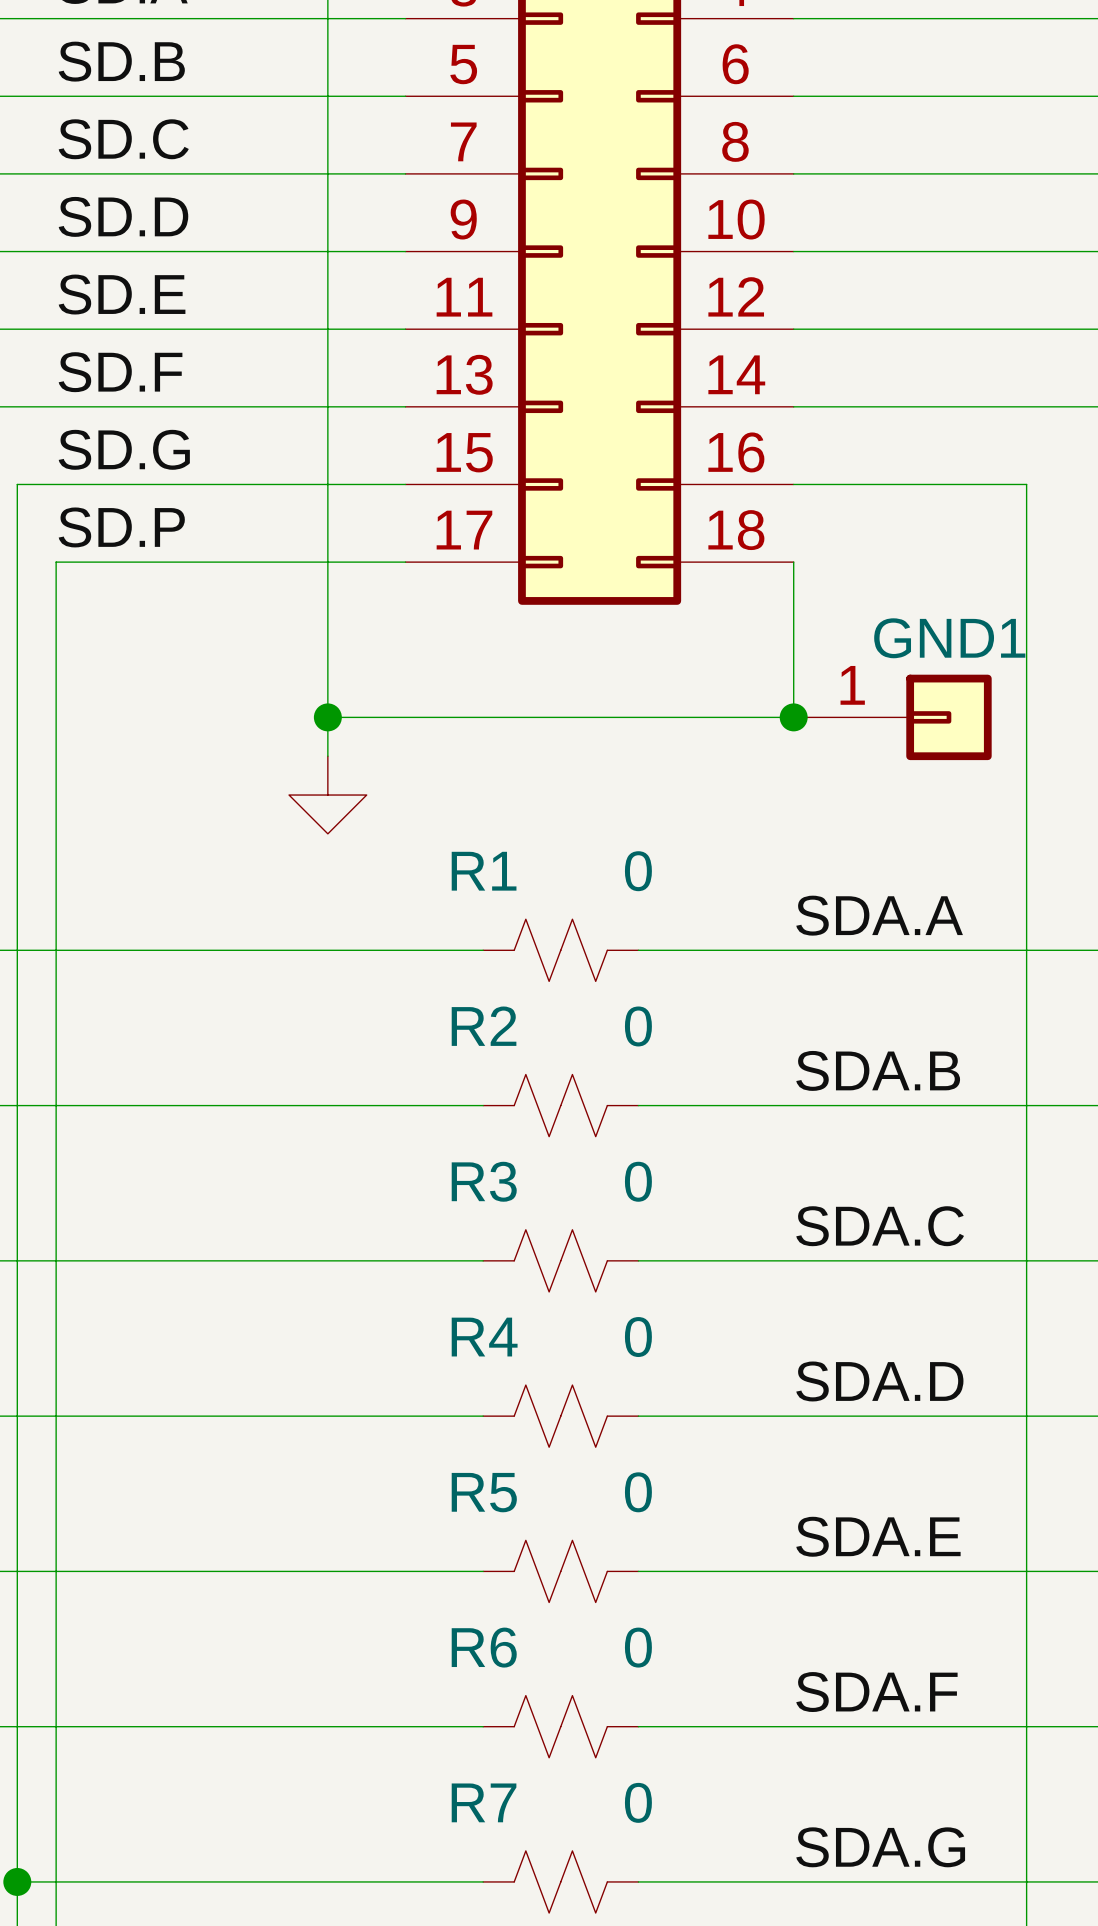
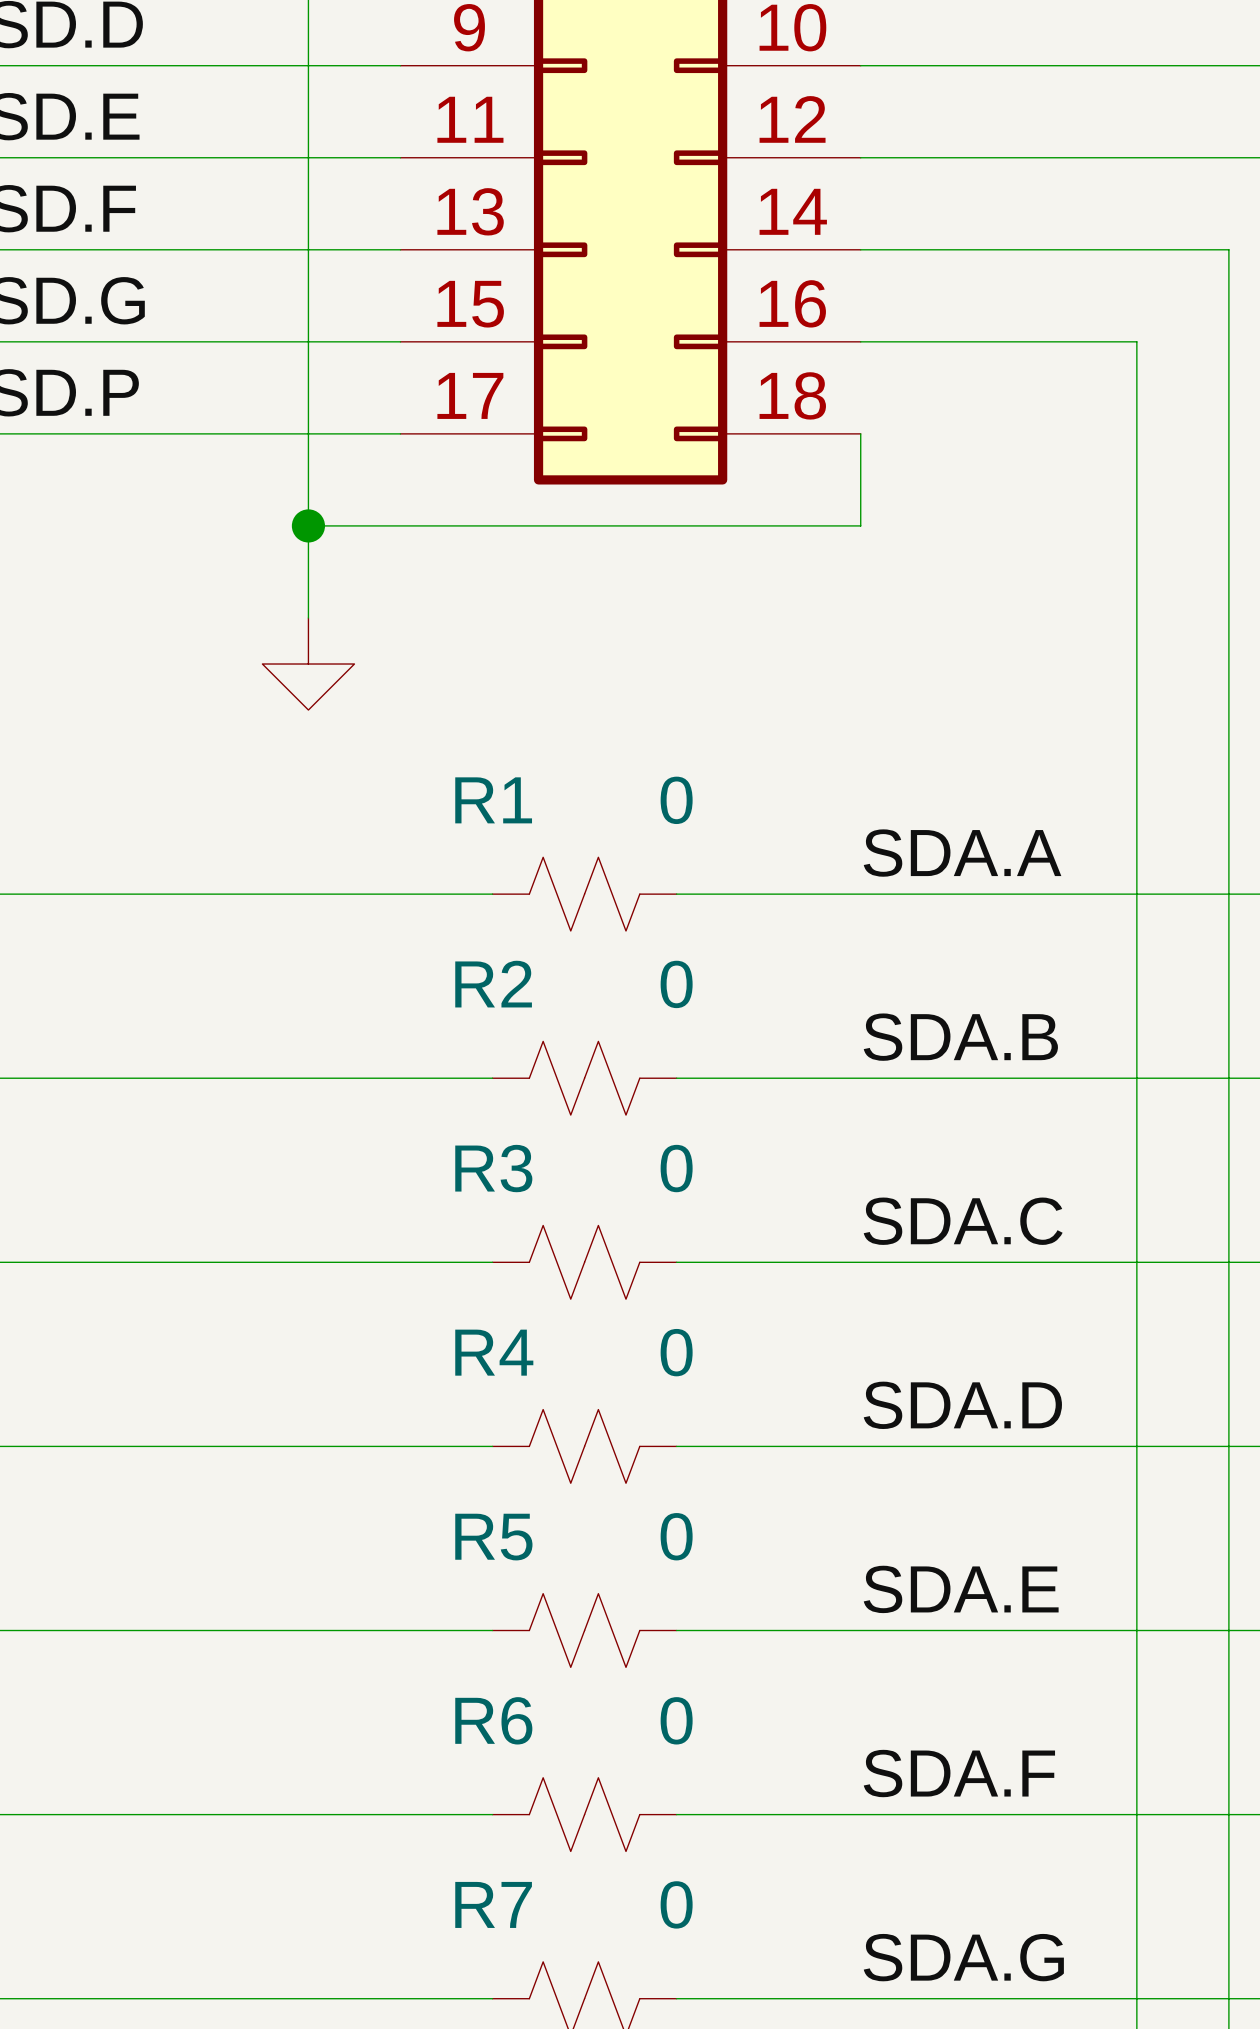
wire: (793, 639) (793, 717) (327, 717) (327, 756) -> (860, 525) (308, 525)
junction position: (327, 717) -> (308, 525)
junction: (793, 717) -> none
GND1: (892, 717) -> none
power symbol position: (327, 795) -> (308, 664)

